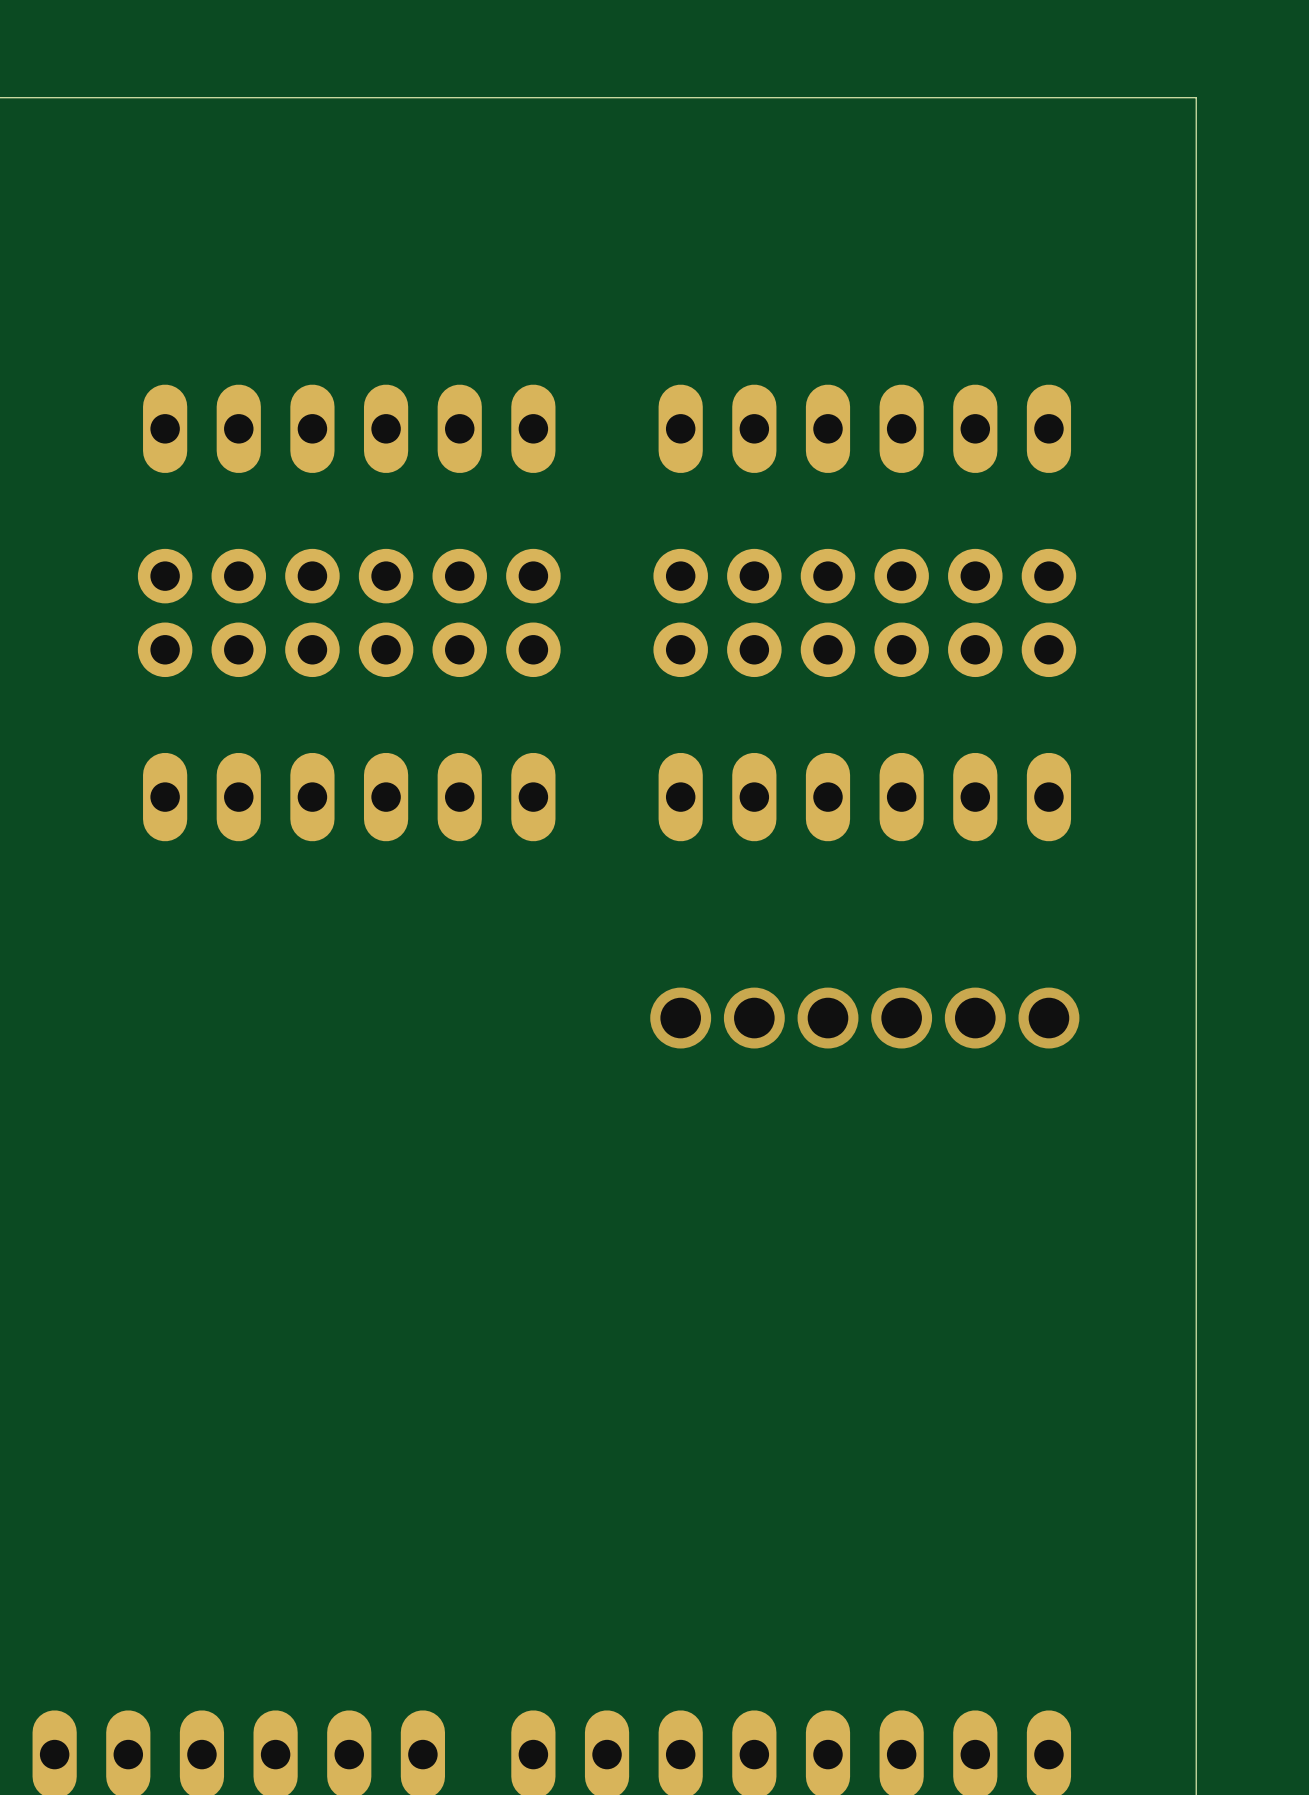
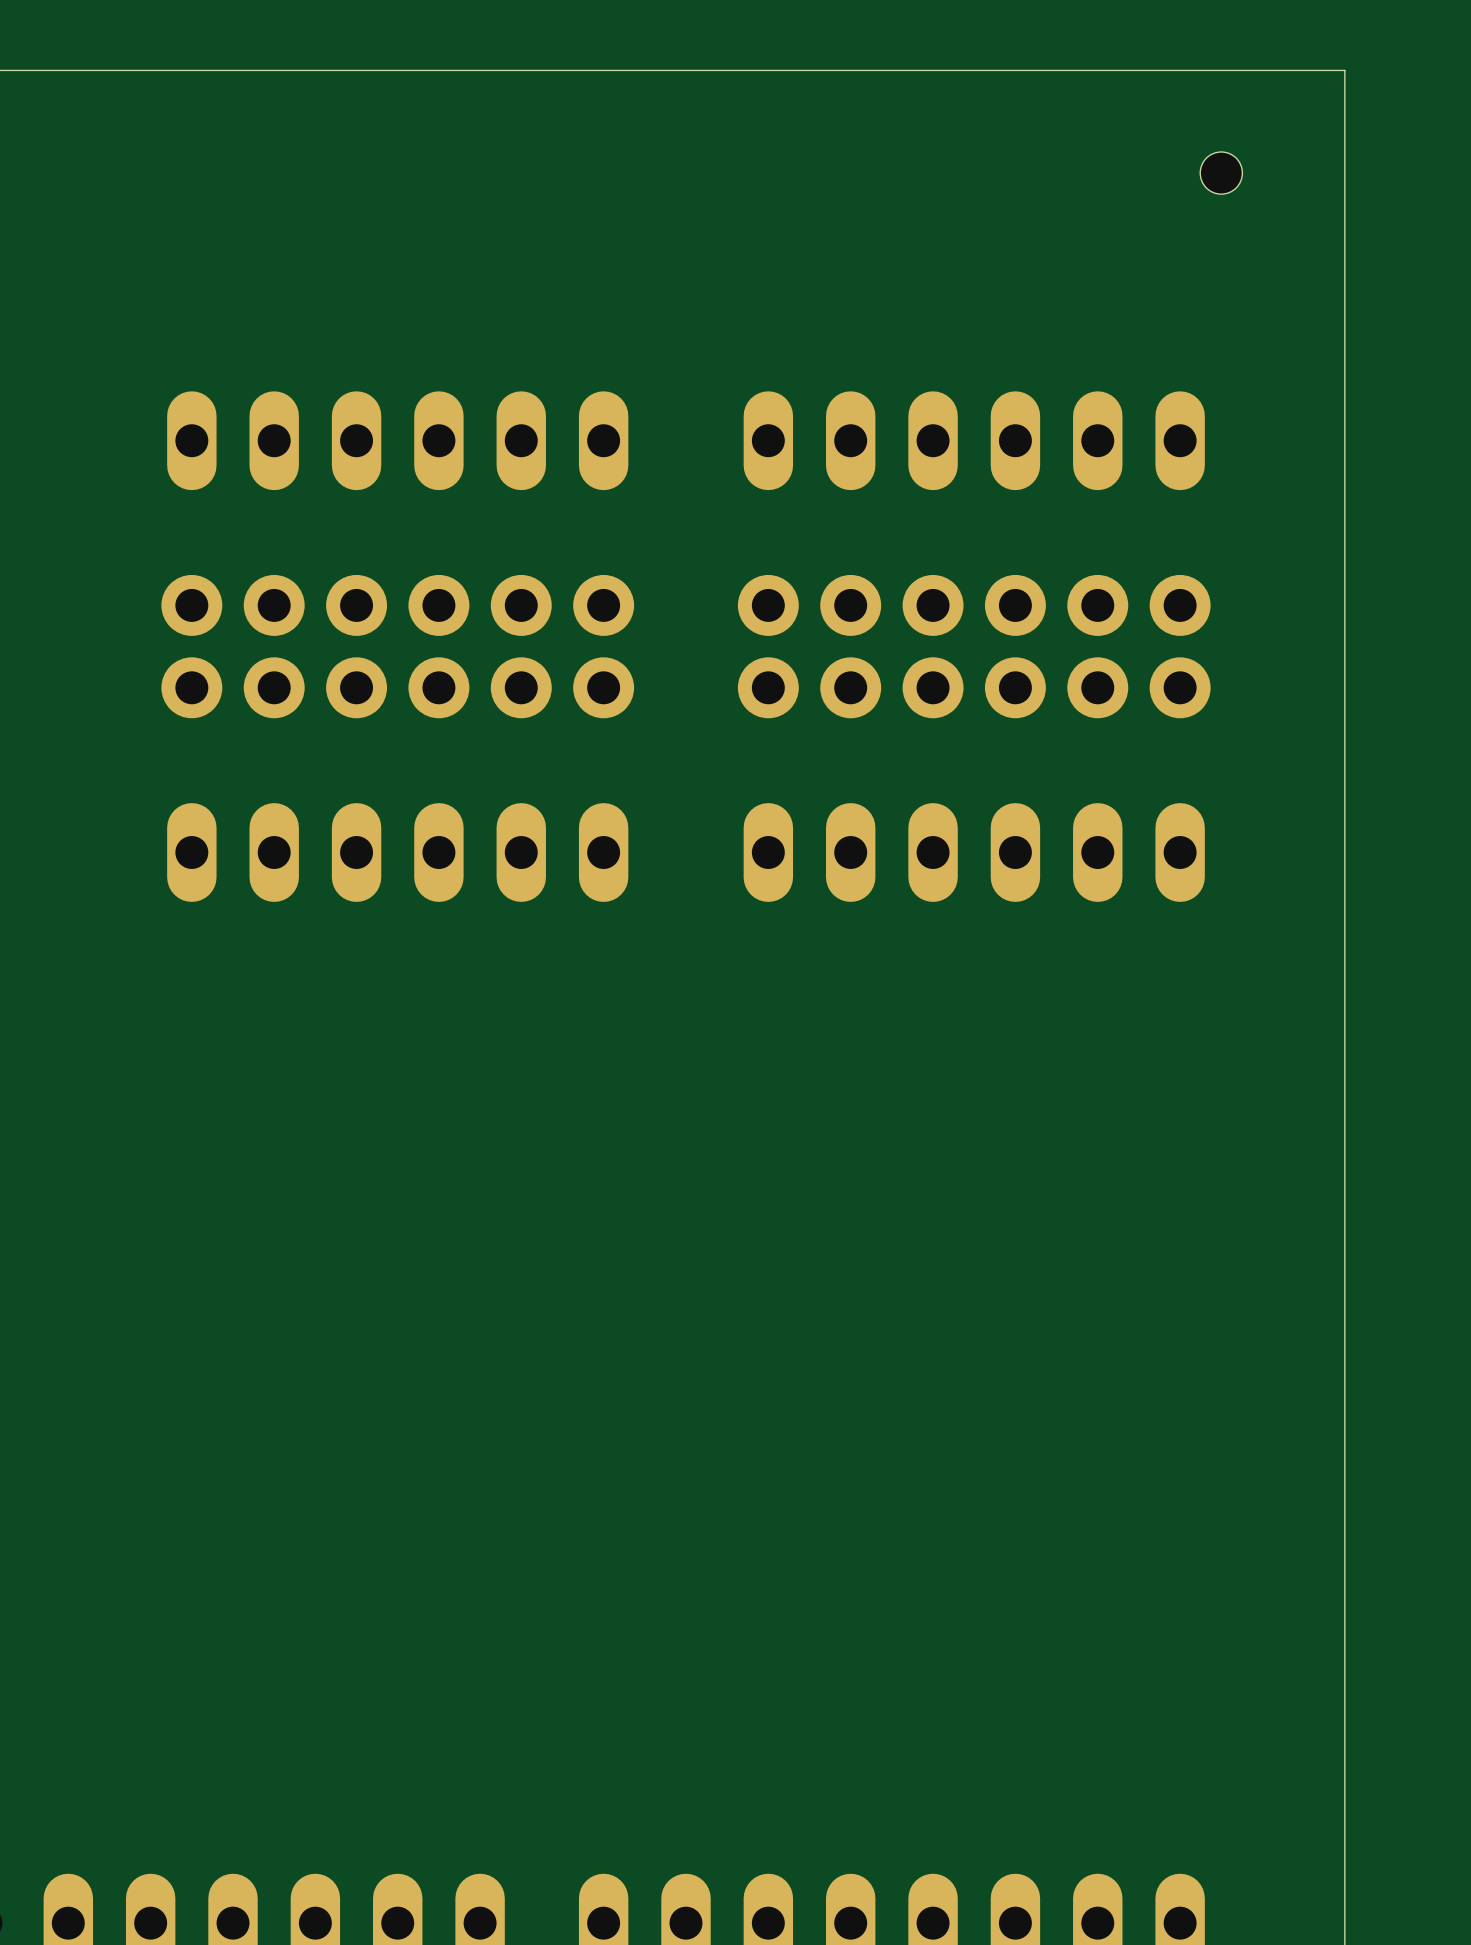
hole: none -> (1221, 173)
via: (680, 1018) -> none
via: (754, 1018) -> none
via: (827, 1018) -> none
via: (901, 1018) -> none
via: (975, 1018) -> none
via: (1048, 1018) -> none

